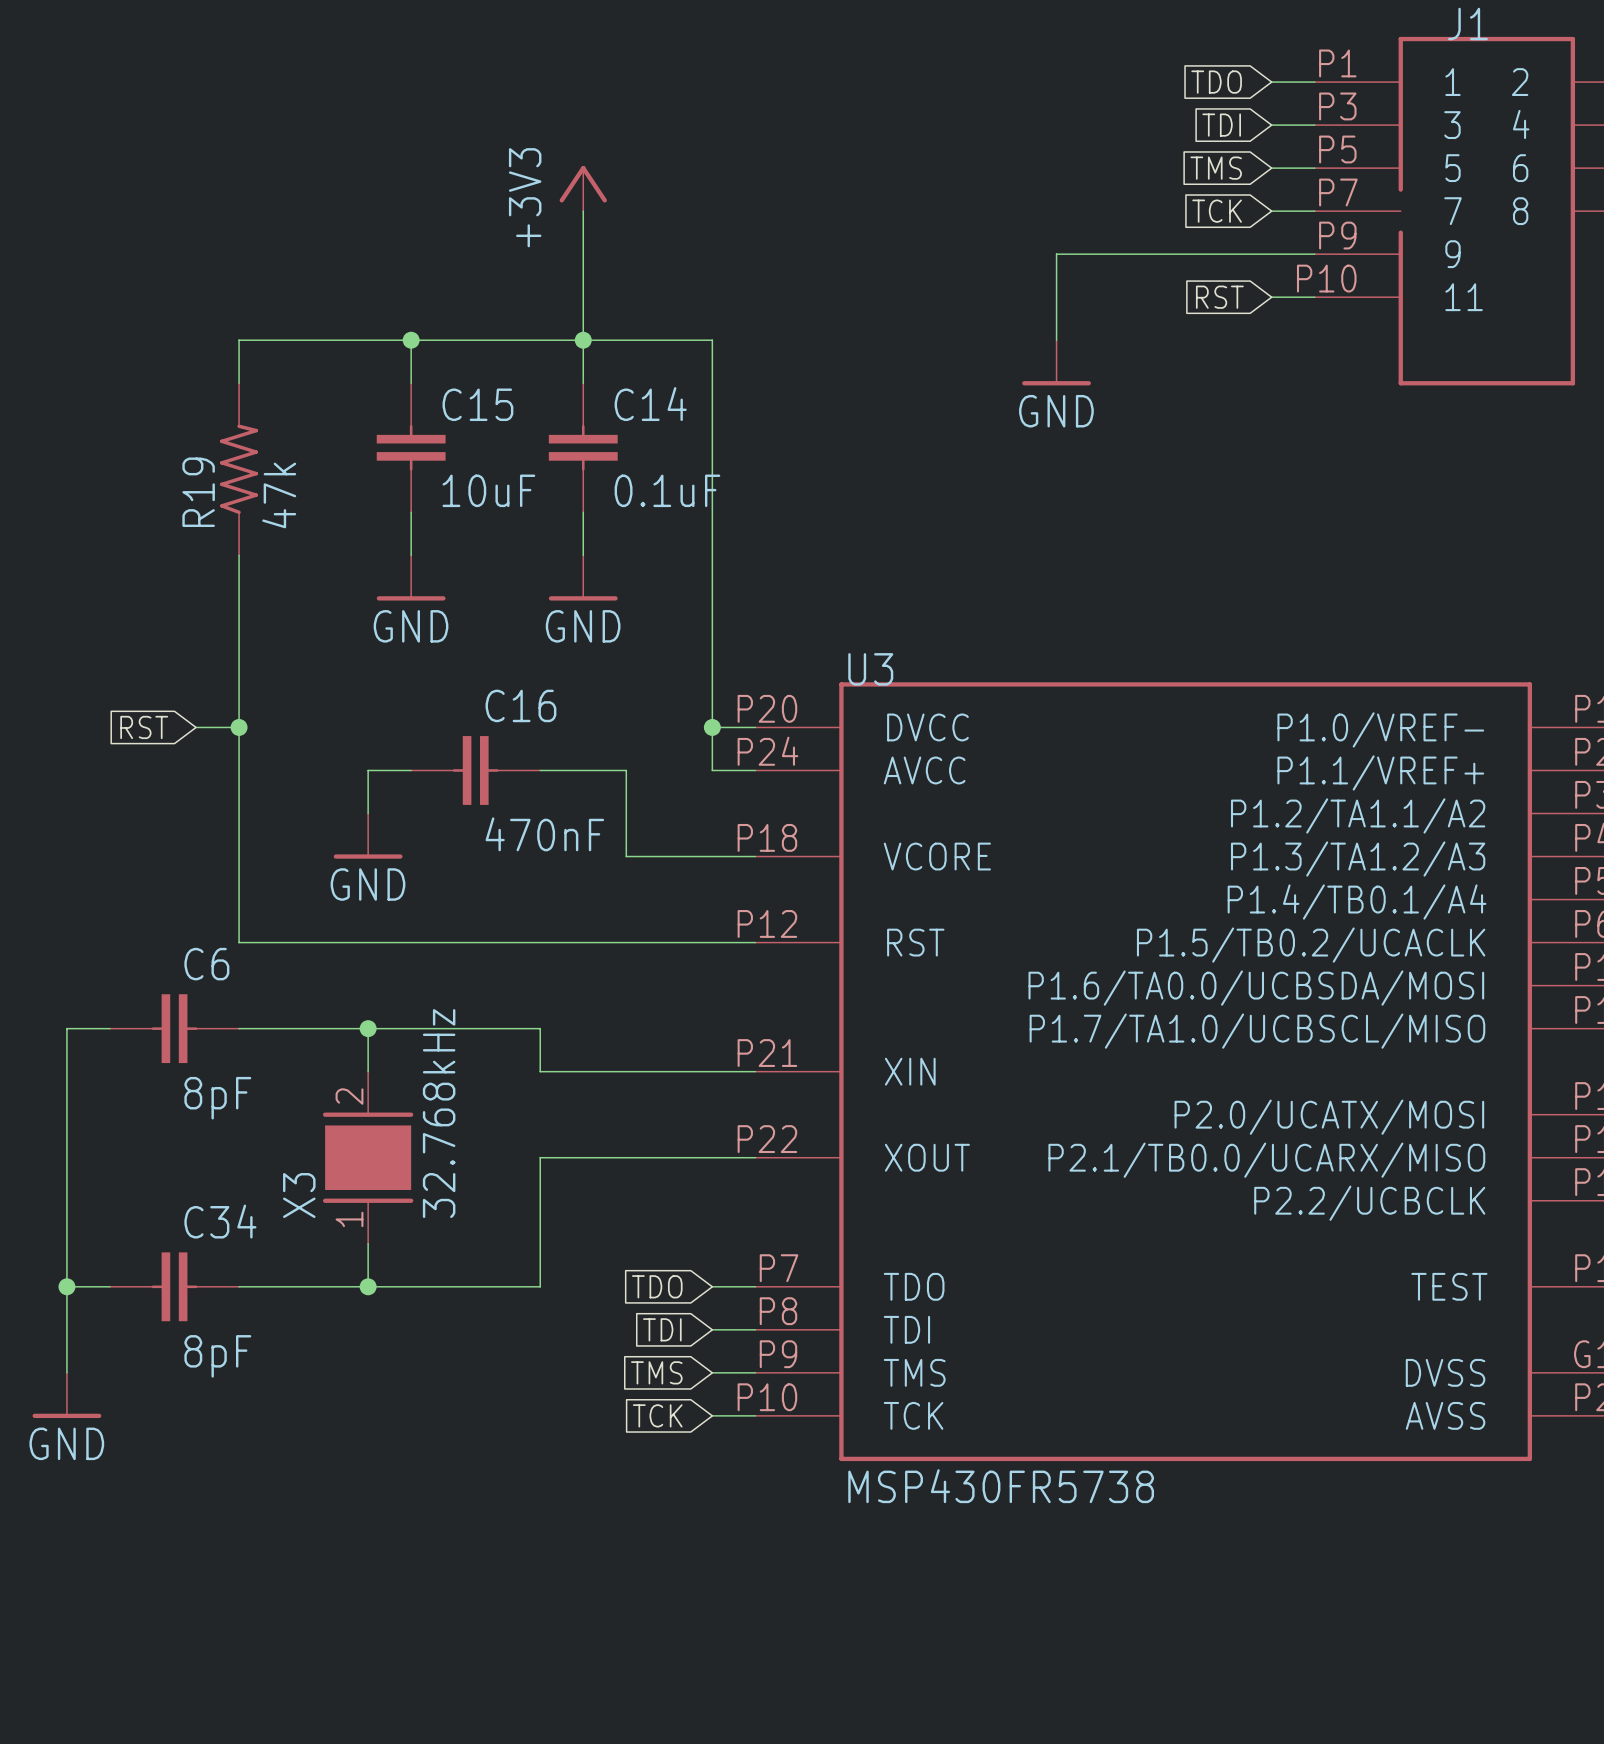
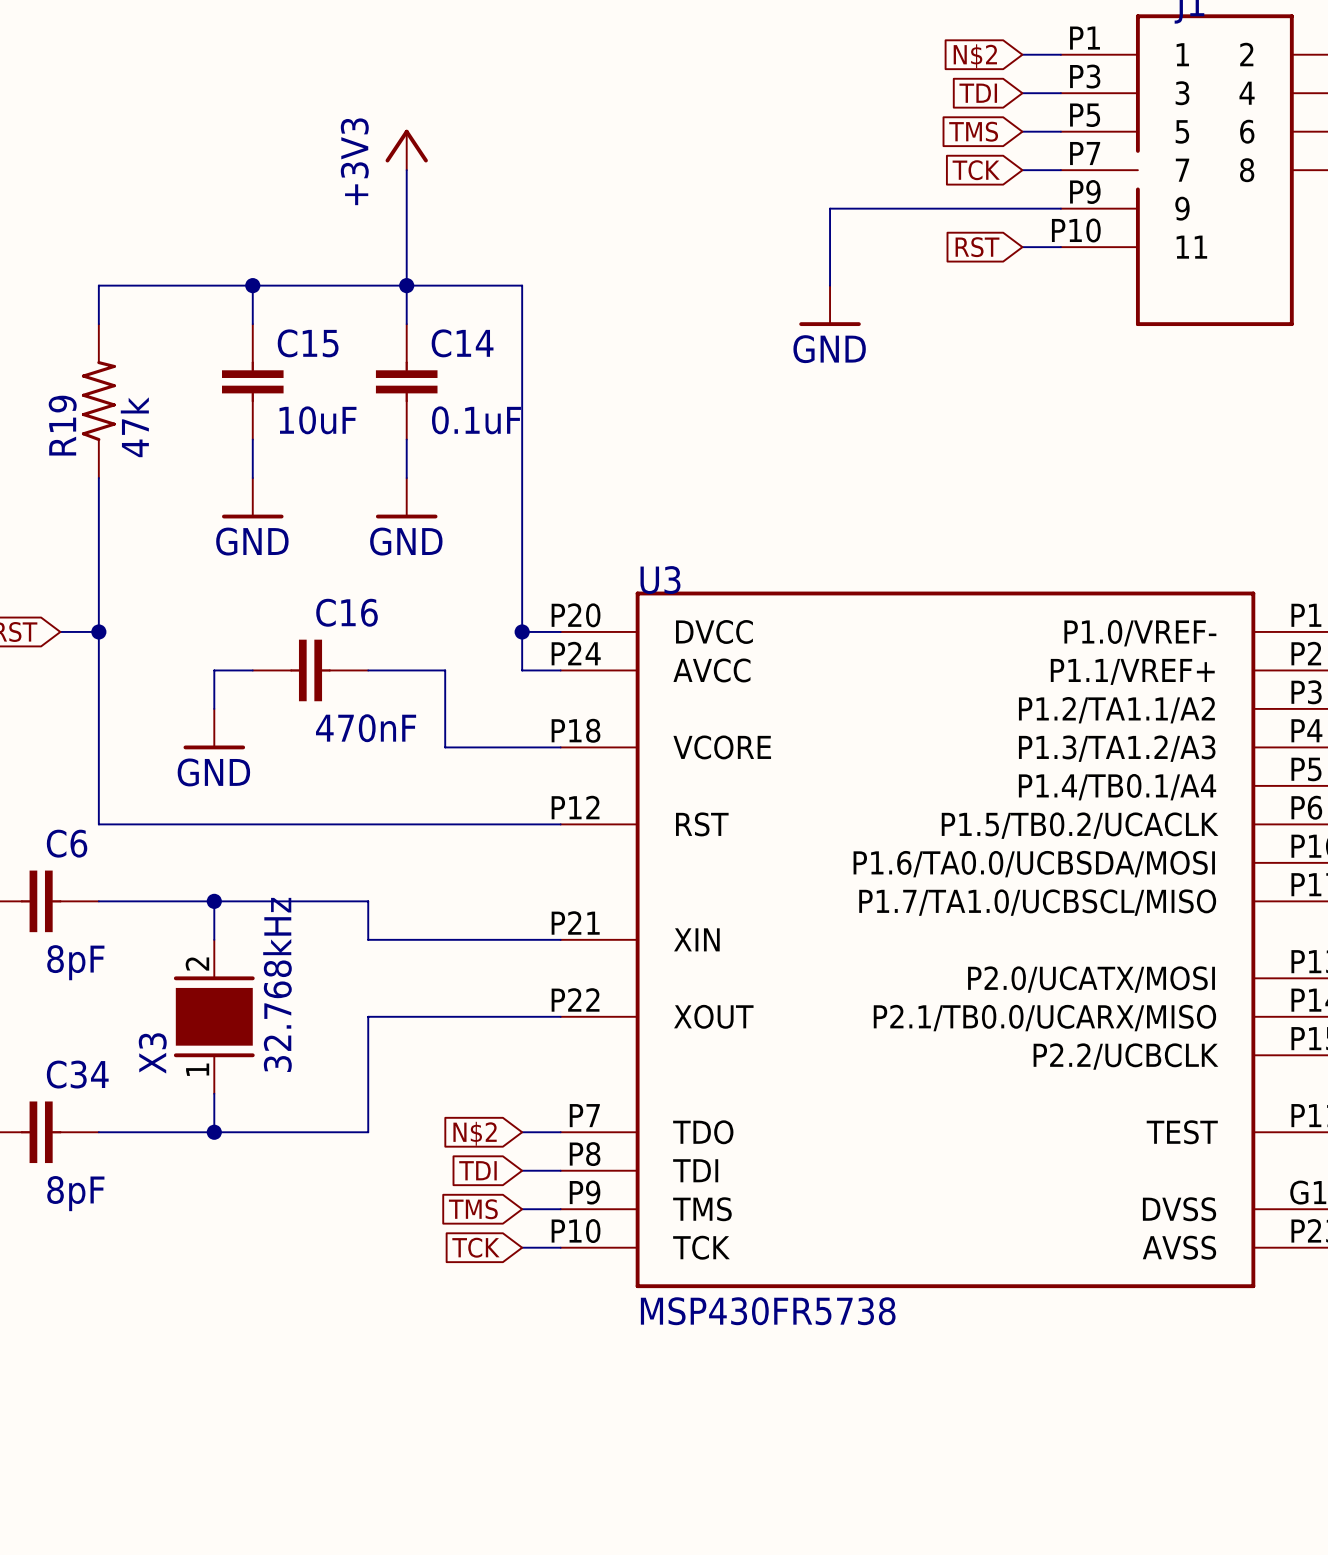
global label: TDO (1216, 82) -> N$2 (975, 56)
global label: TDO (657, 1286) -> N$2 (475, 1133)

